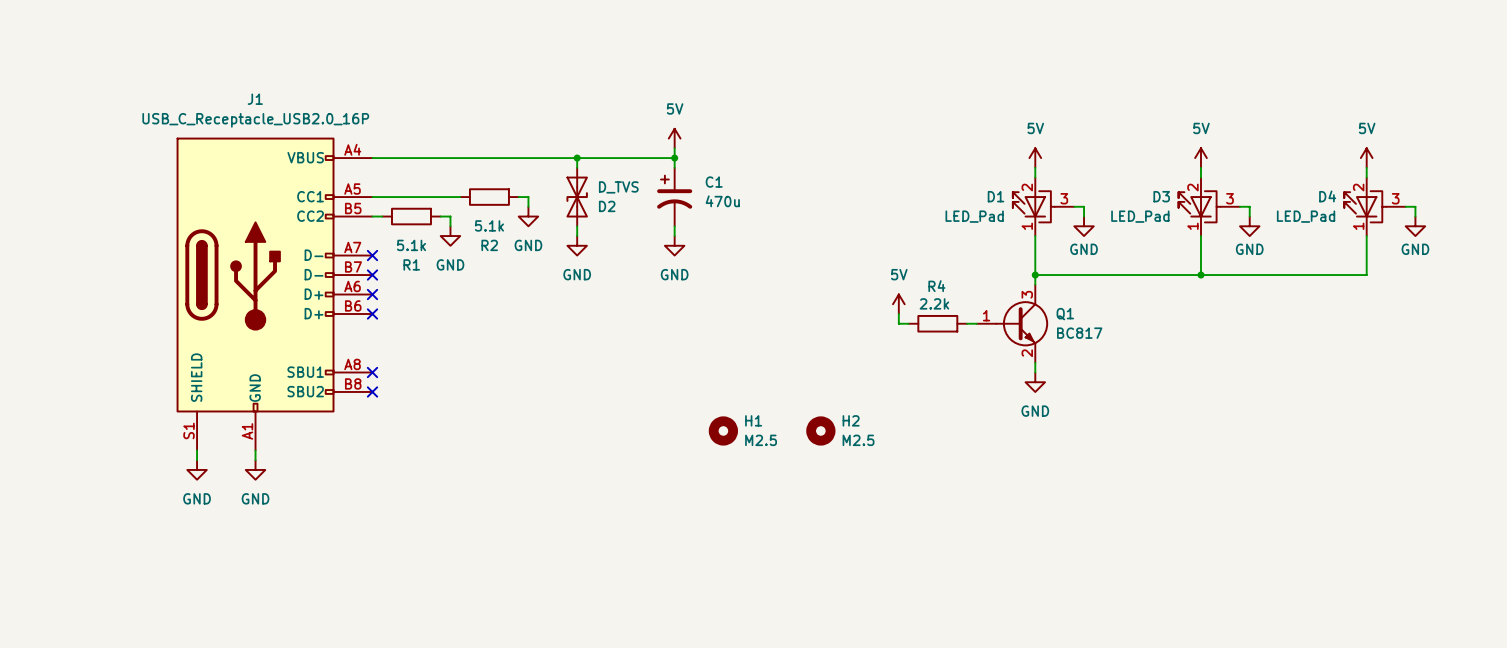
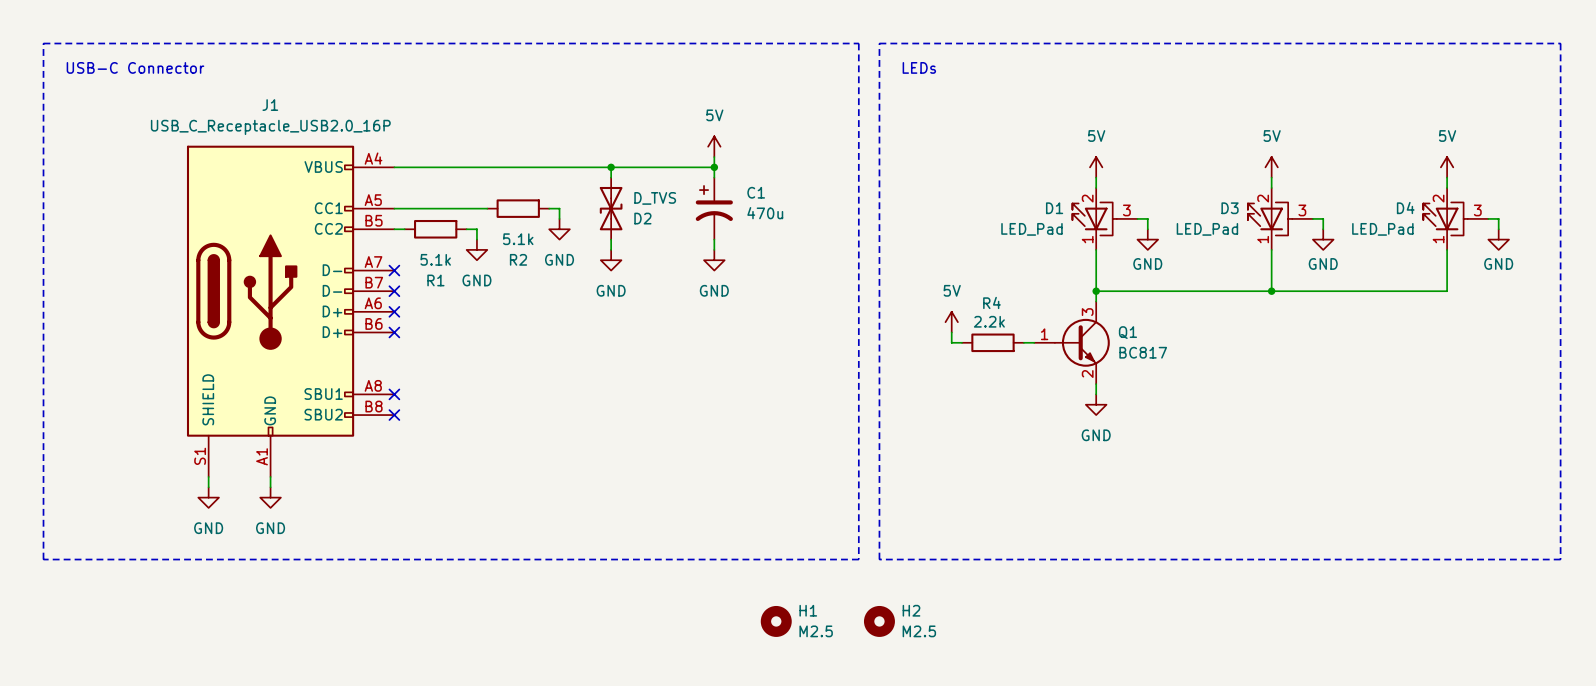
line: none -> (43, 43) (858, 43) (858, 559) (43, 559) (43, 43)
line: none -> (879, 43) (1560, 43) (1560, 559) (879, 559) (879, 43)
text: none -> USB-C Connector (135, 67)
text: none -> LEDs (919, 67)
H1 position: (723, 430) -> (776, 621)
H2 position: (820, 430) -> (879, 621)

